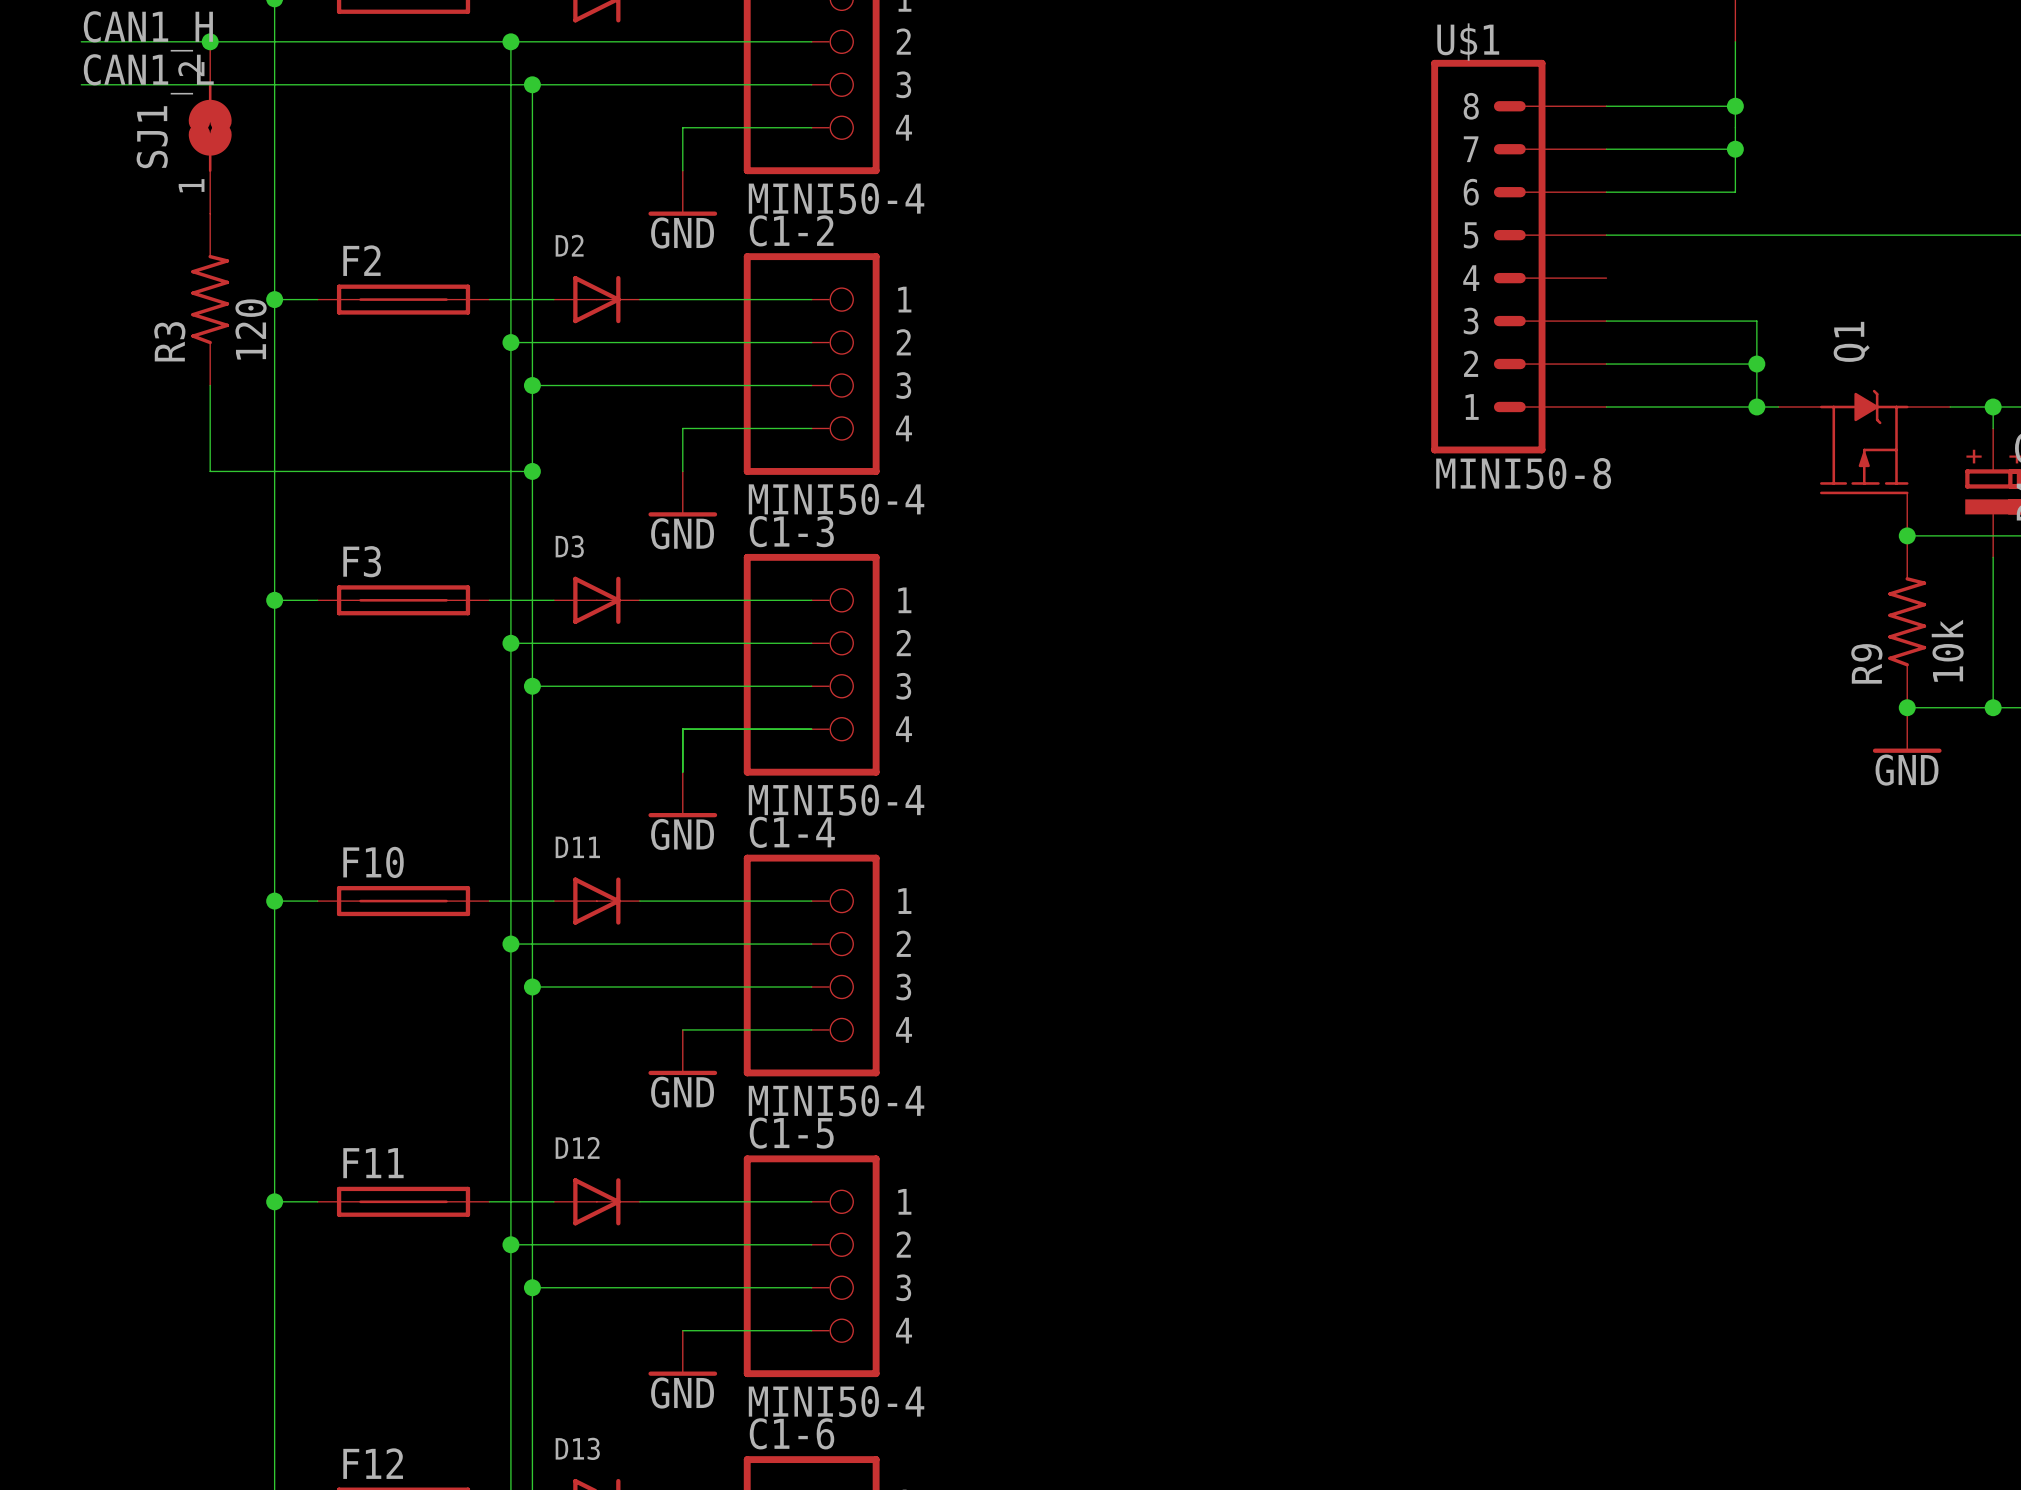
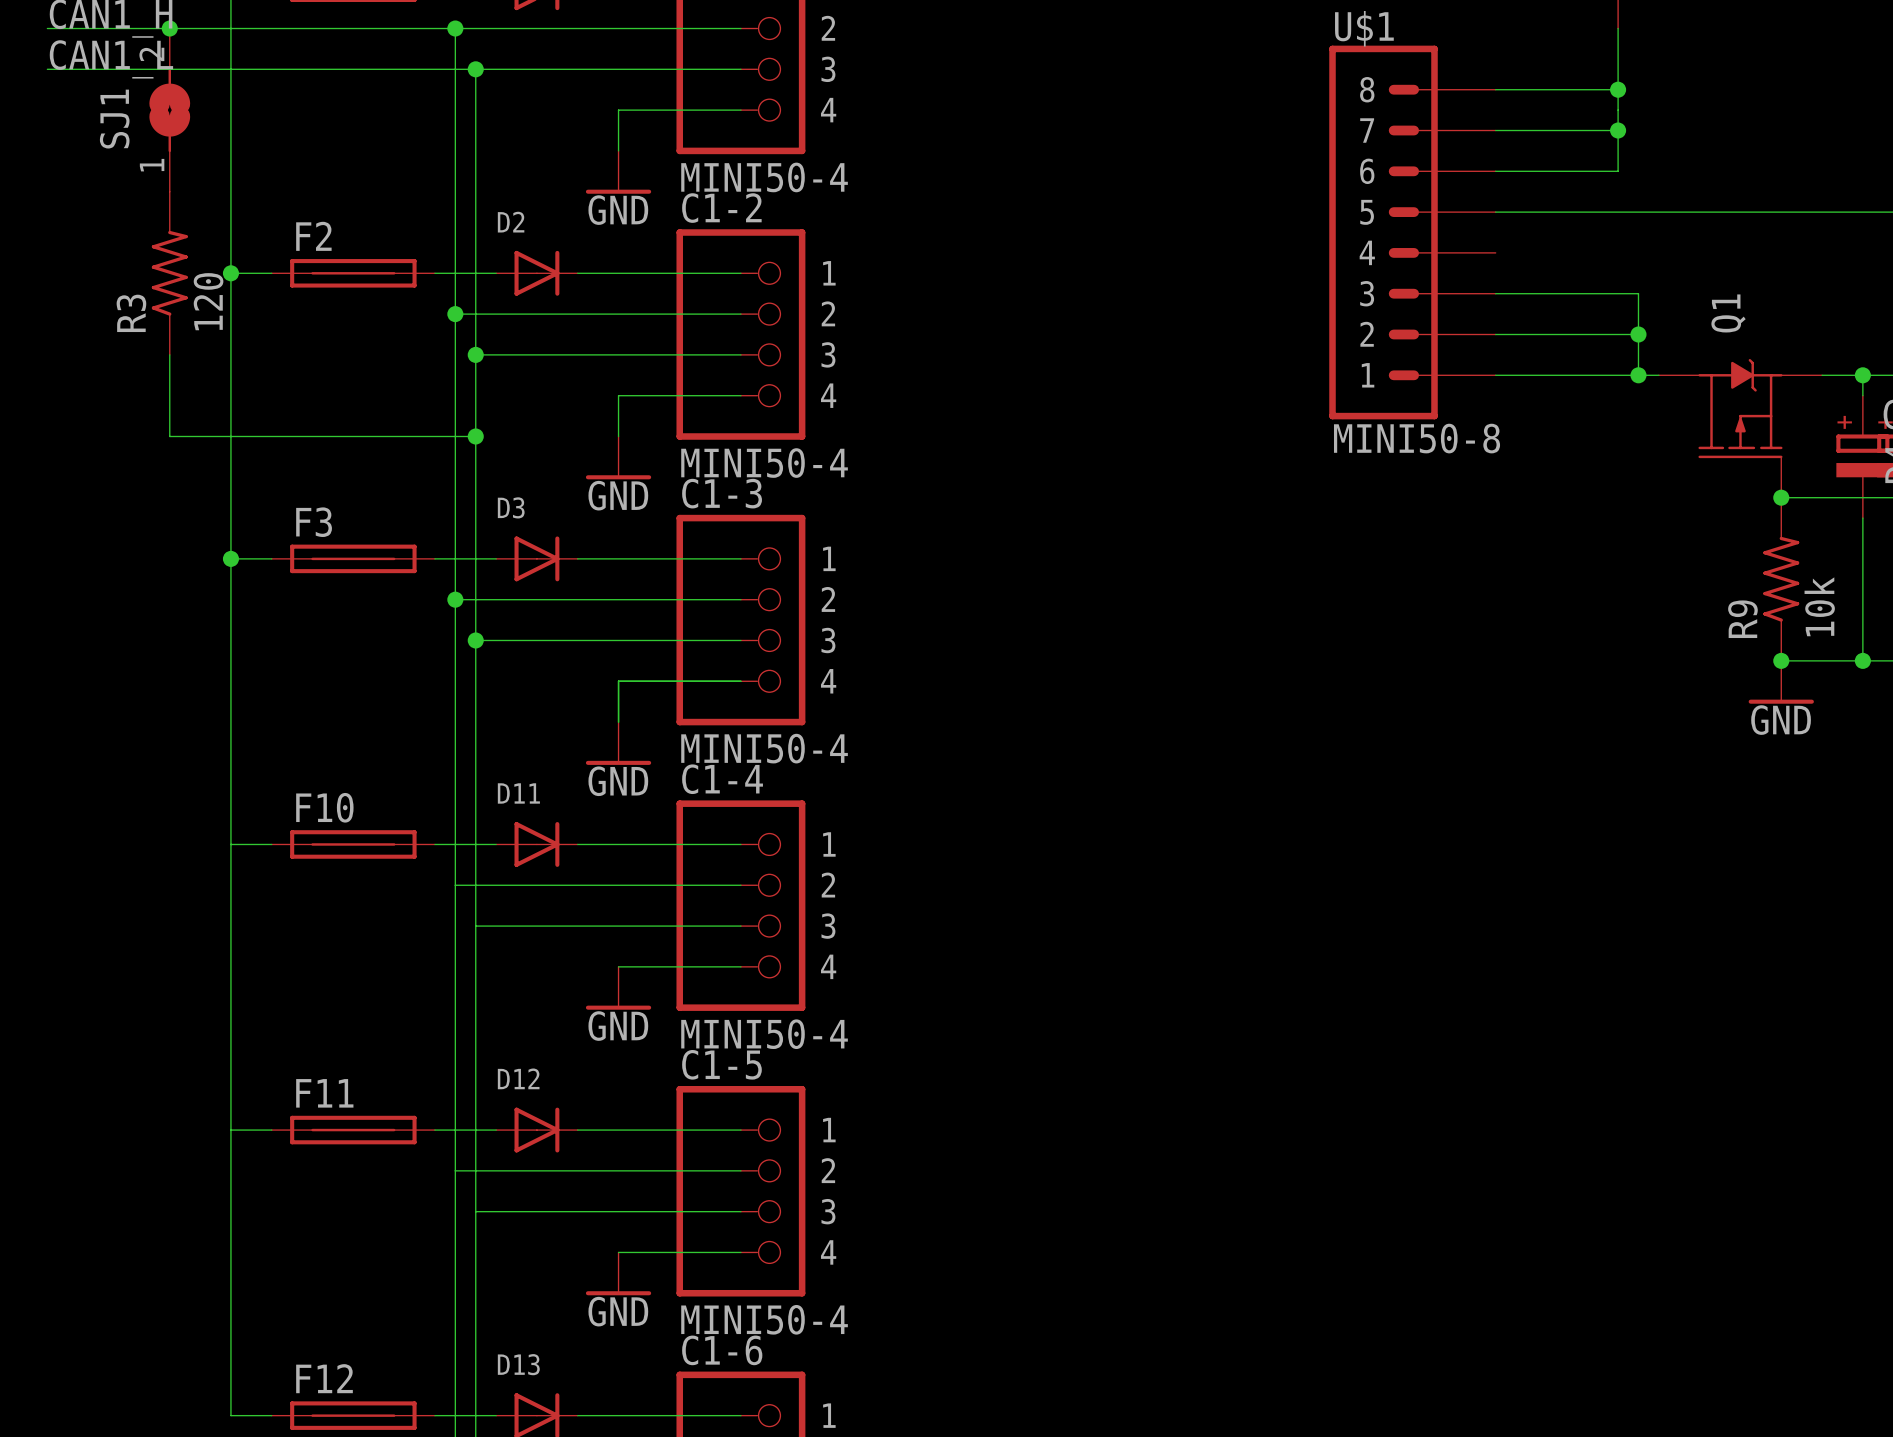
junction: (274, 901) -> none
junction: (510, 944) -> none
junction: (532, 987) -> none
junction: (274, 1201) -> none
junction: (510, 1244) -> none
junction: (532, 1287) -> none

